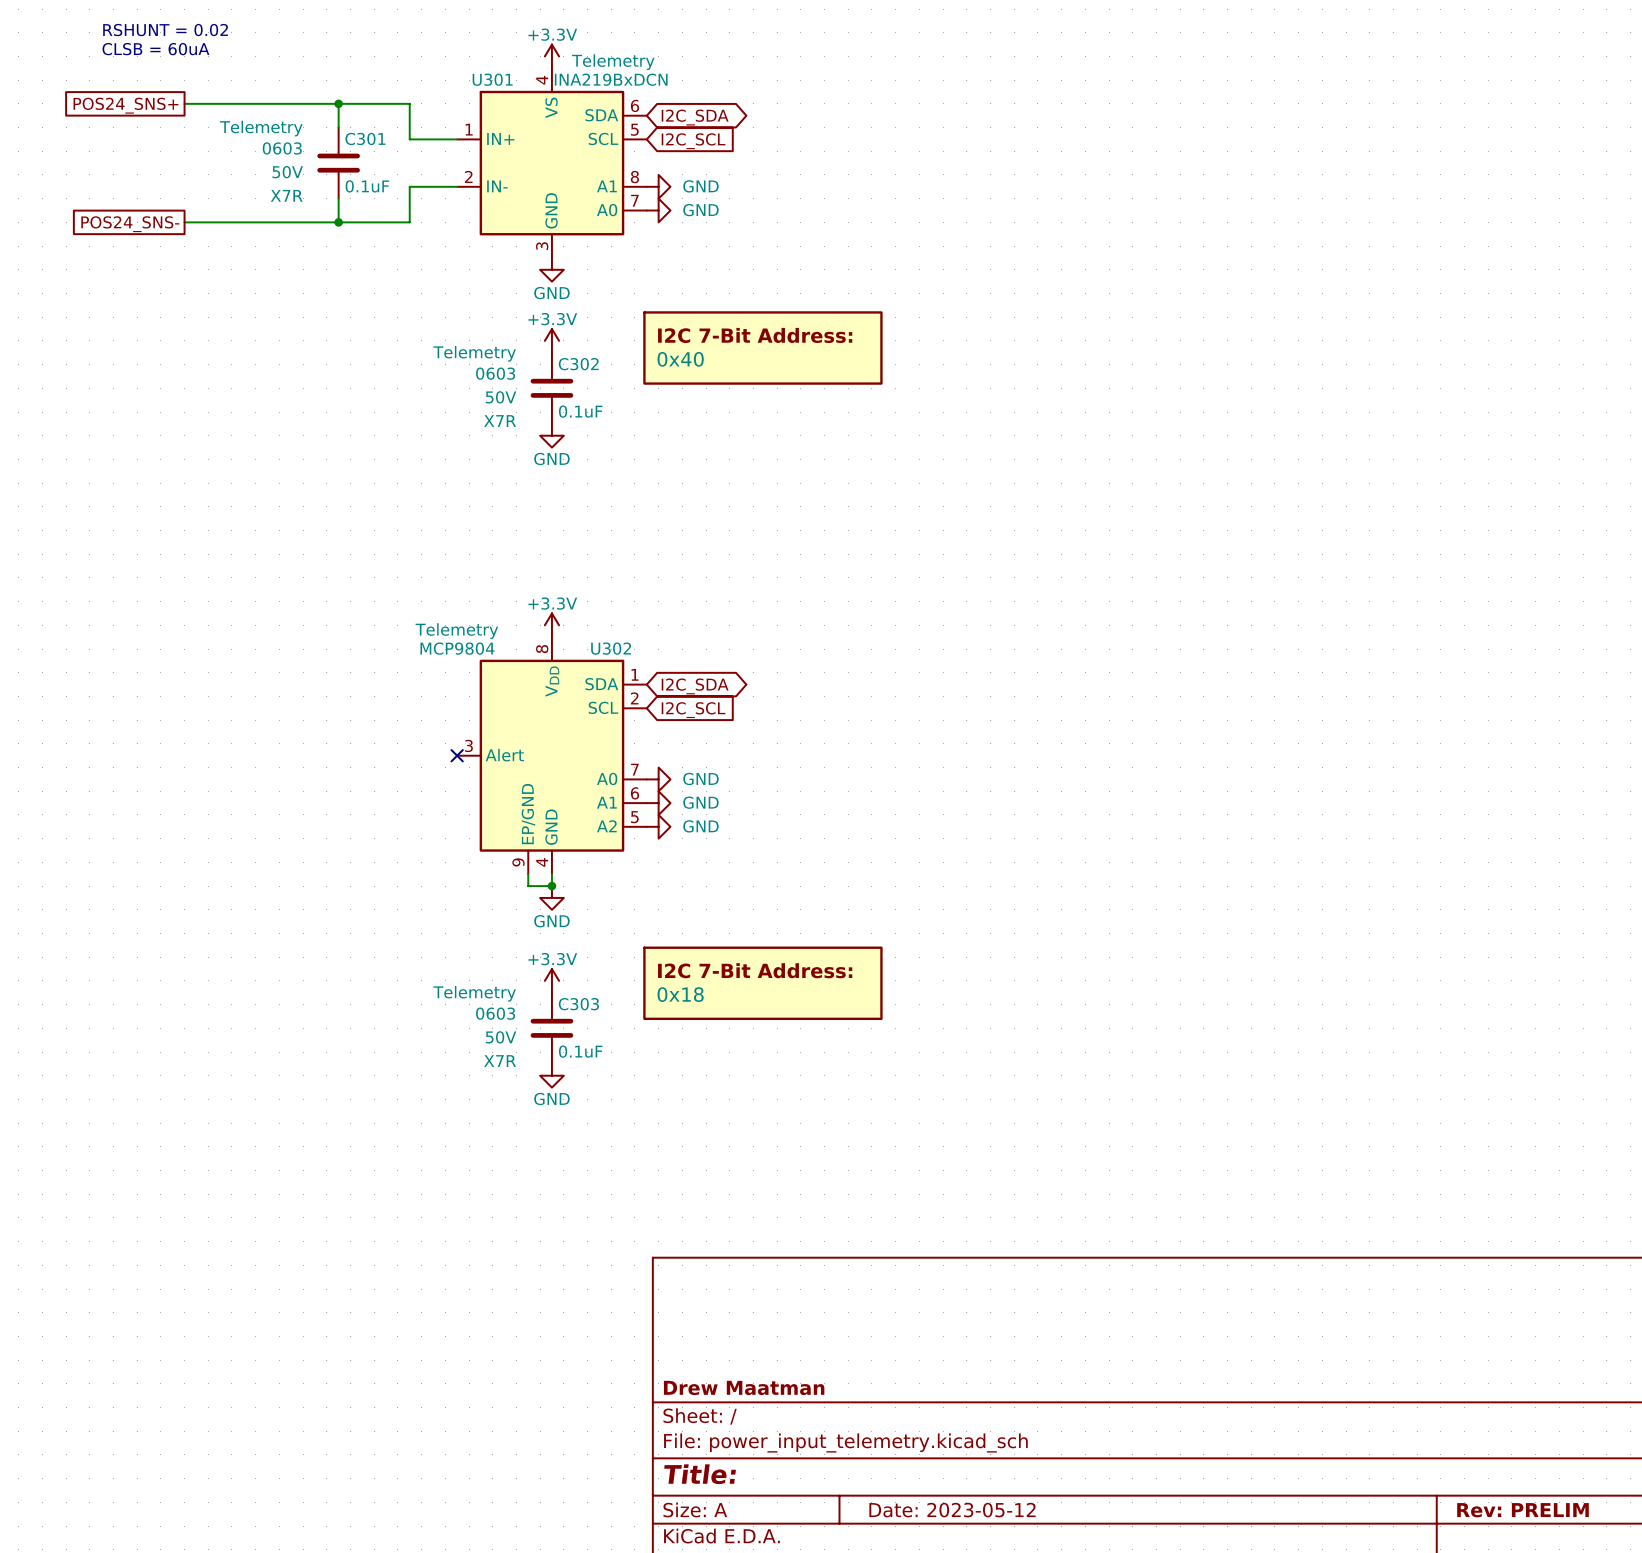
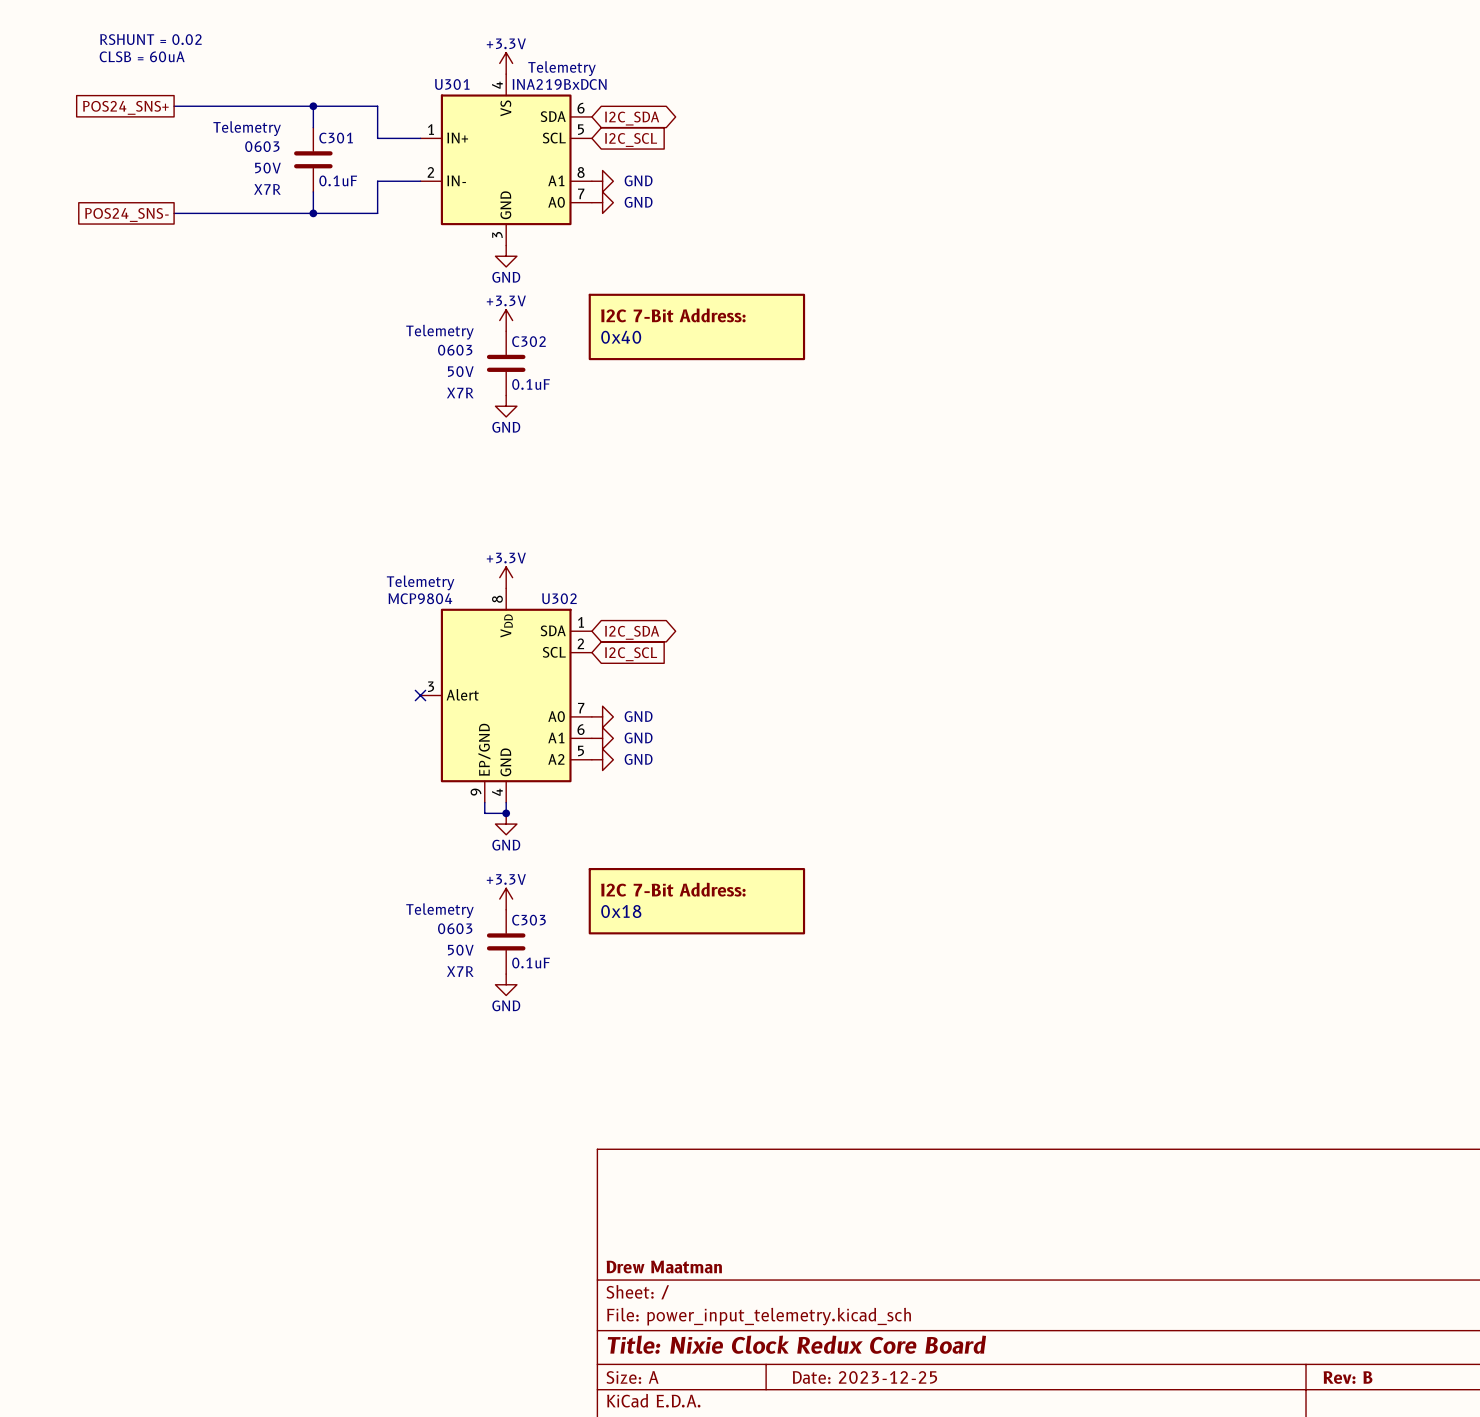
title block: Title: (700, 1474) -> Title: Nixie Clock Redux Core Board (796, 1344)
title block: Date: 2023-05-12 (952, 1510) -> Date: 2023-12-25 (864, 1377)
title block: Rev: PRELIM (1522, 1510) -> Rev: B (1347, 1377)

